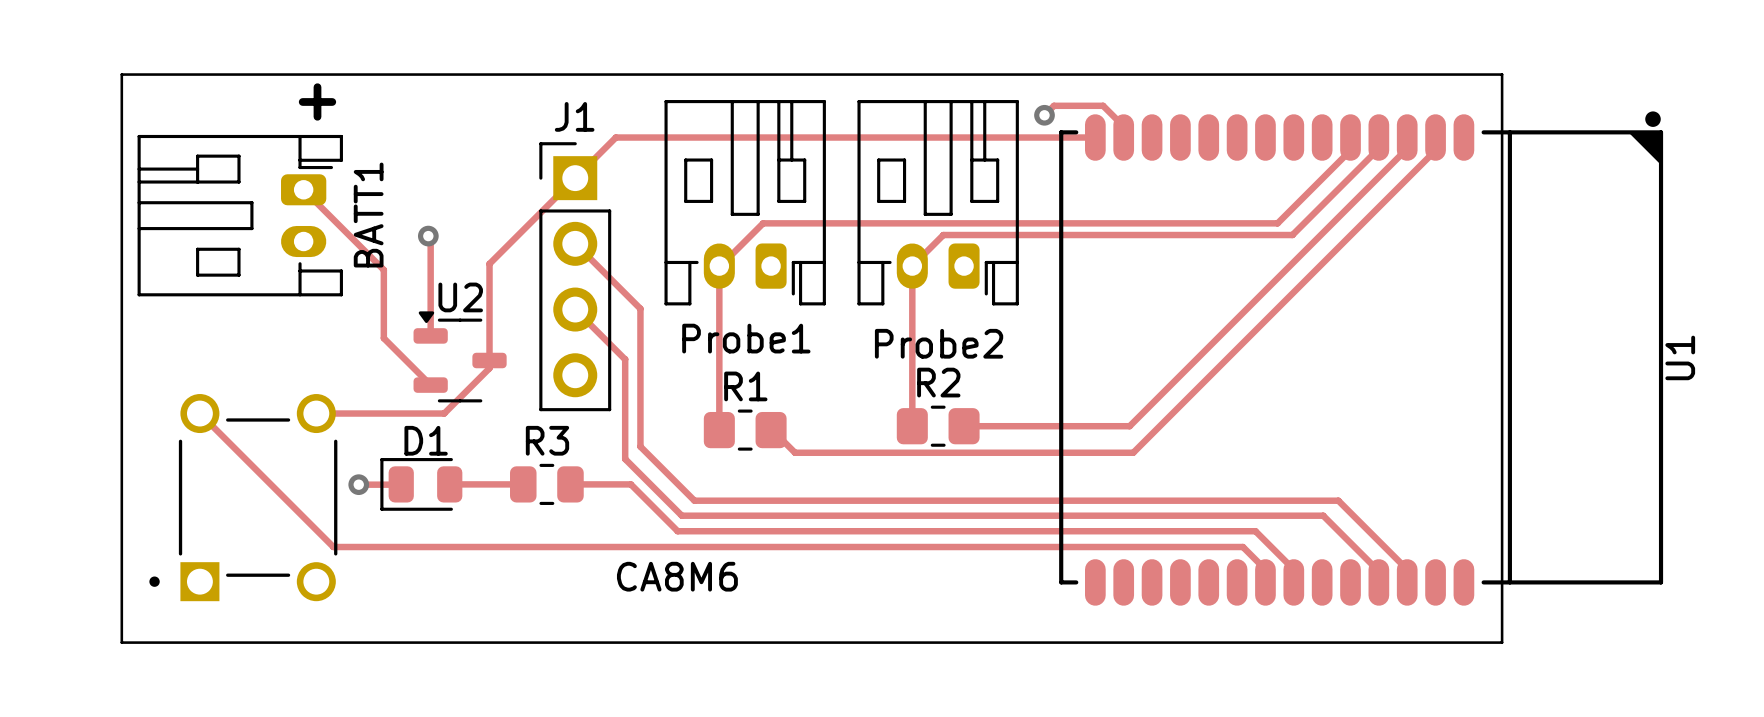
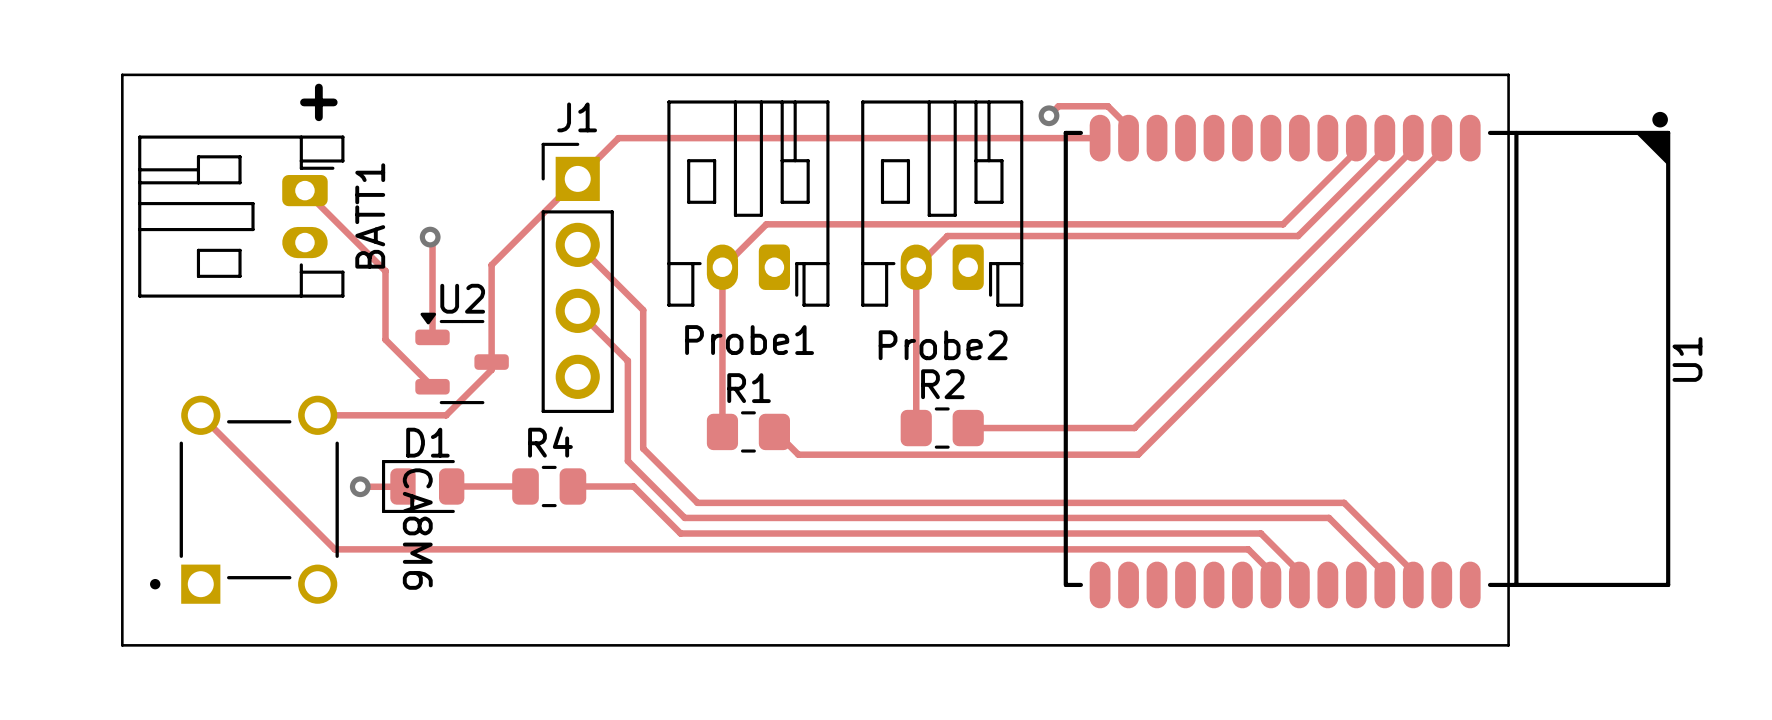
R3 name: R3 (547, 440) -> R4 (550, 442)
text rotation: 0° (677, 576) -> 90° clockwise (417, 529)
text position: CA8M6 (677, 576) -> CA8M6 (417, 529)

